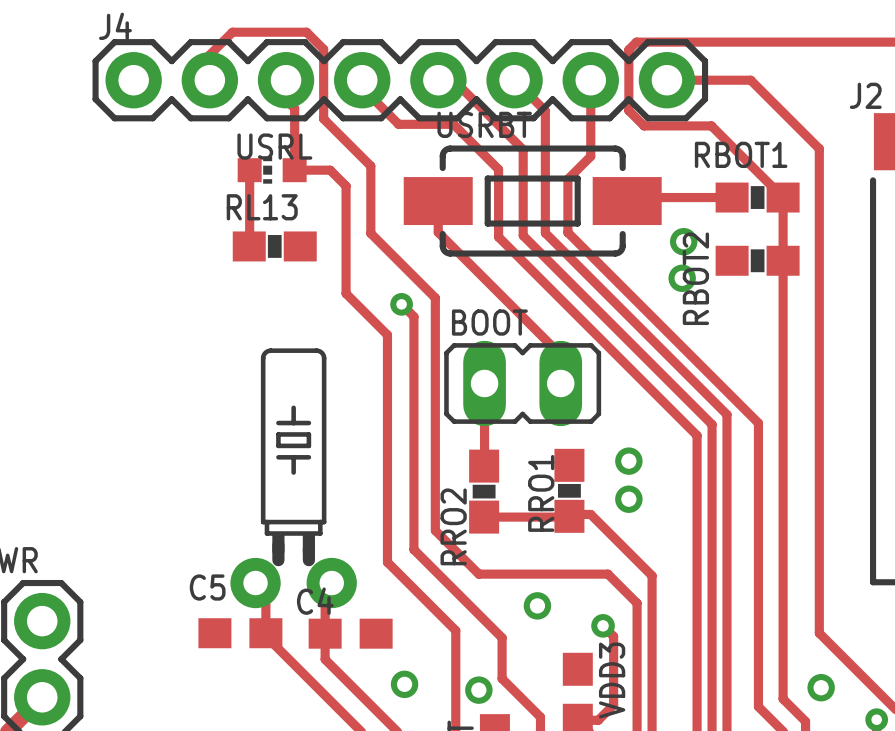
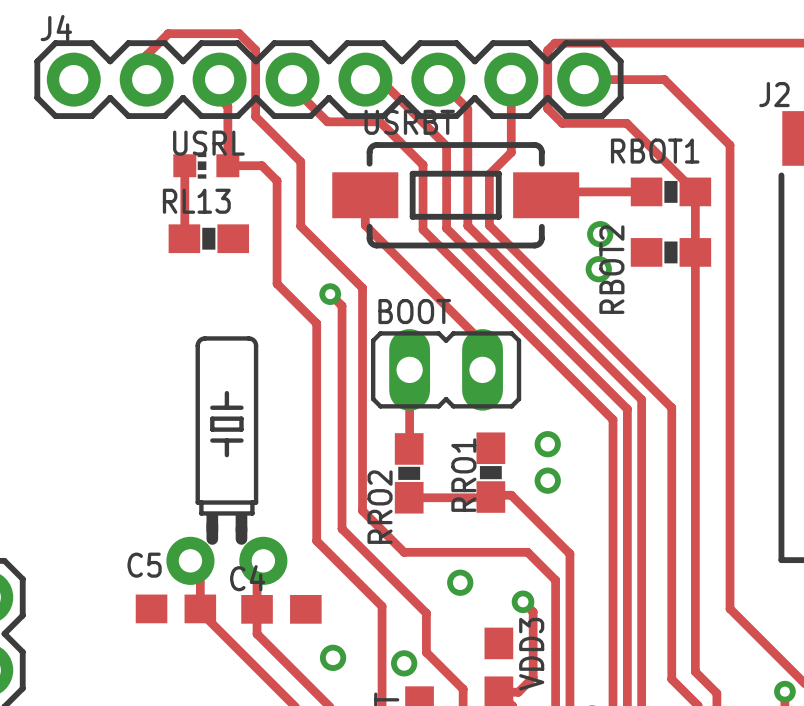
via: (821, 687) -> none

